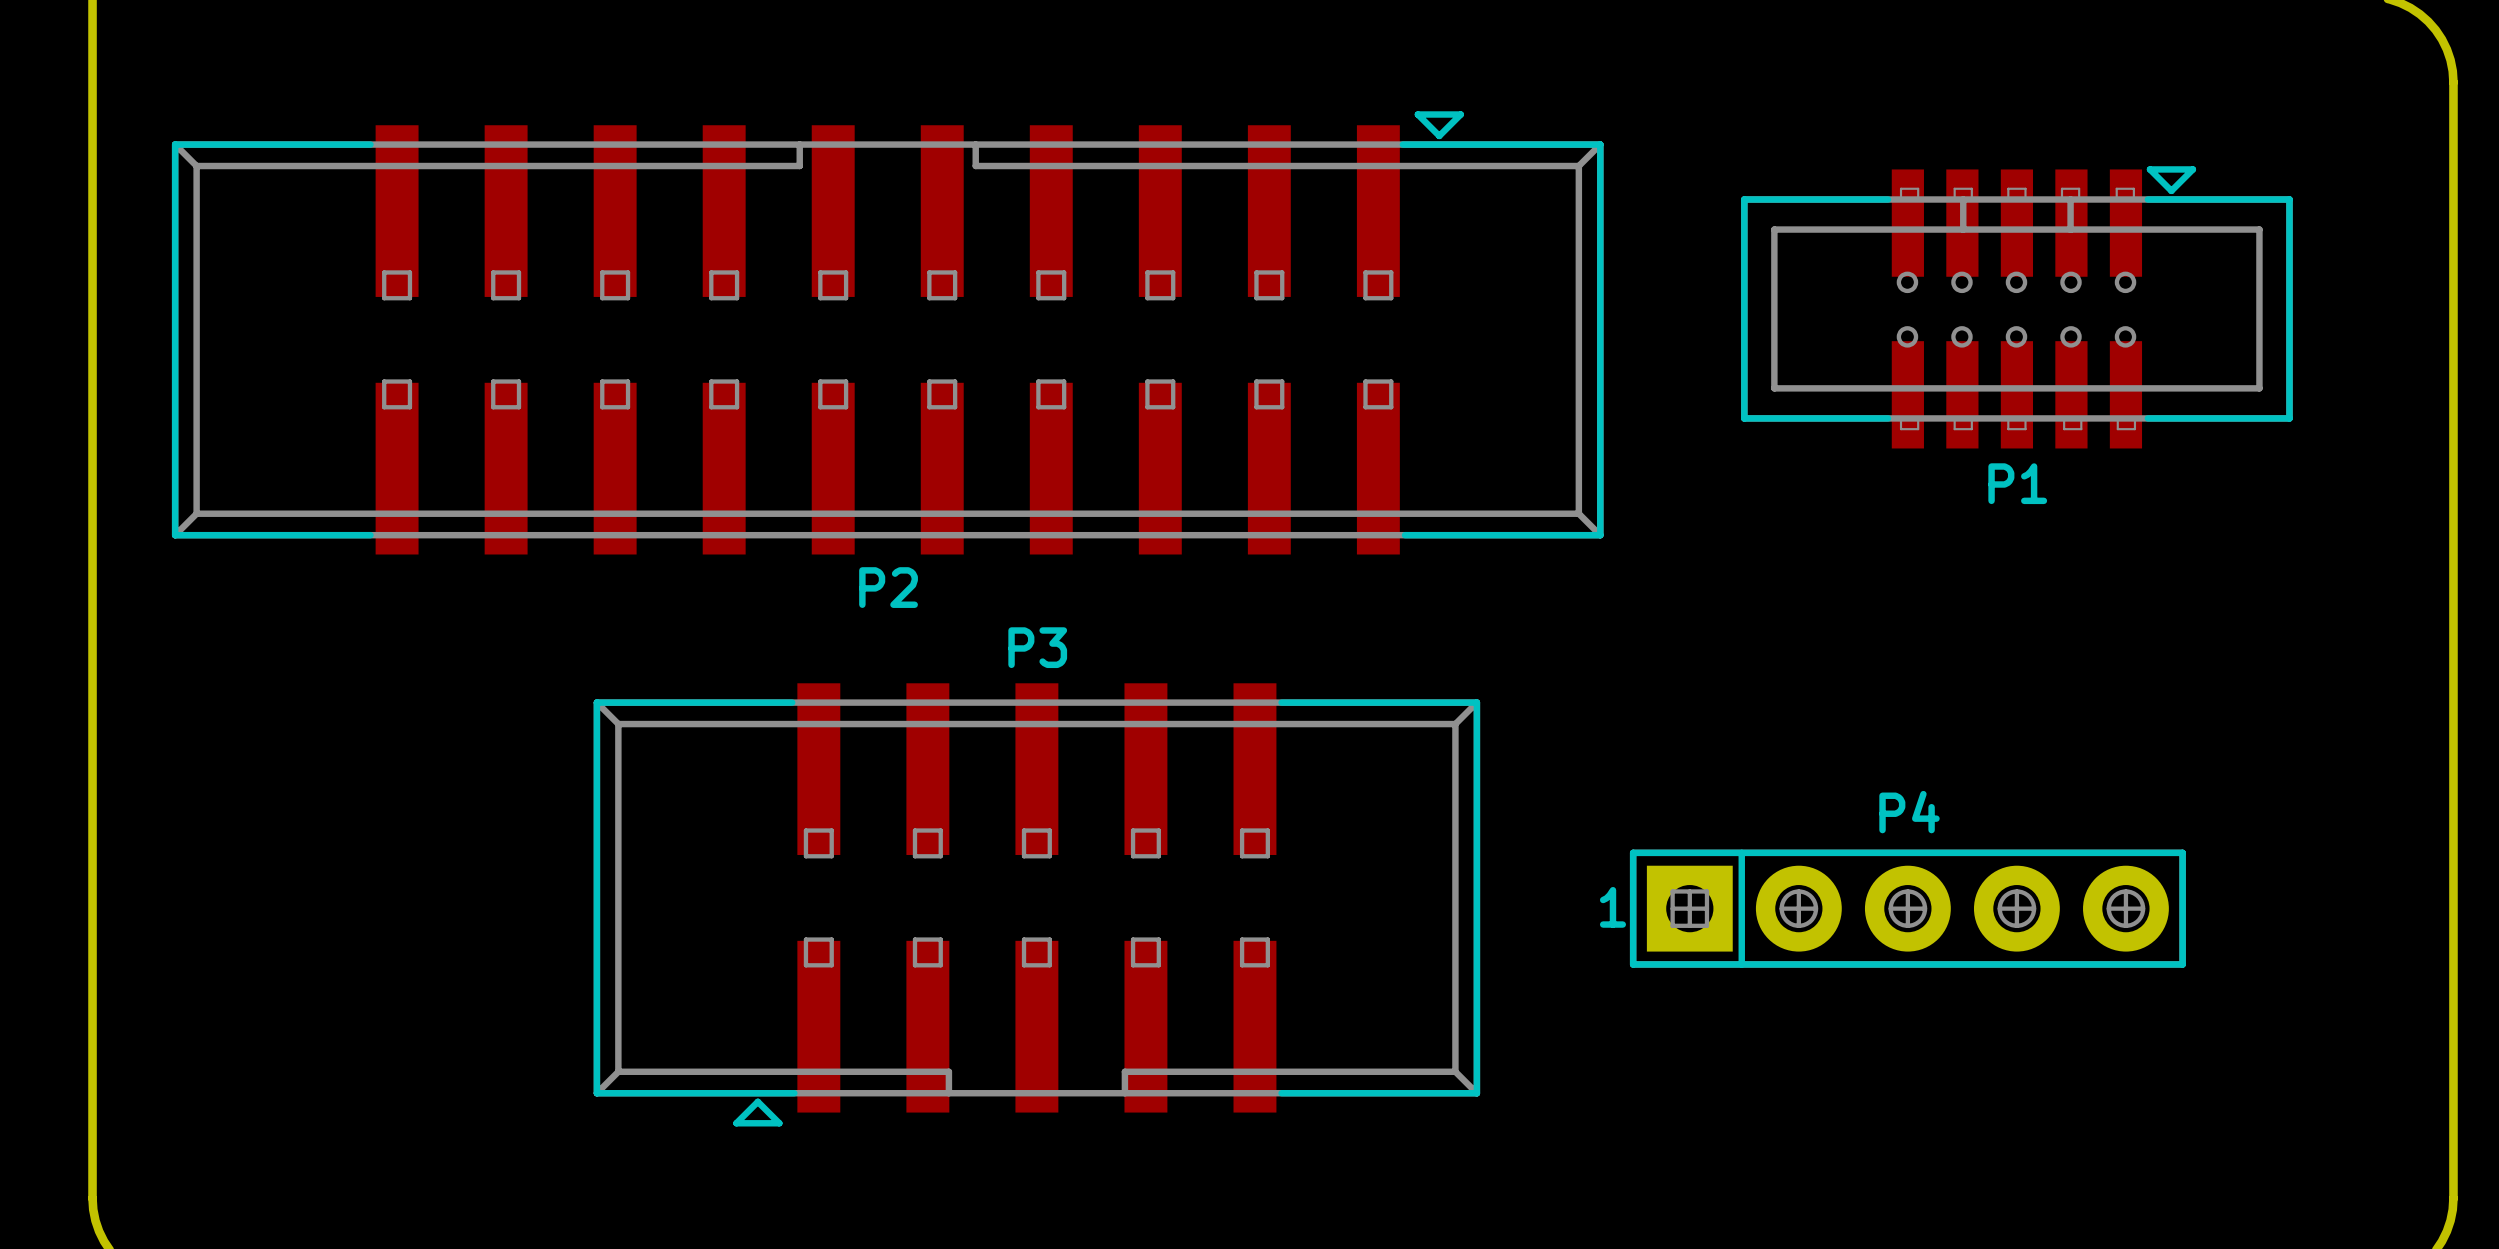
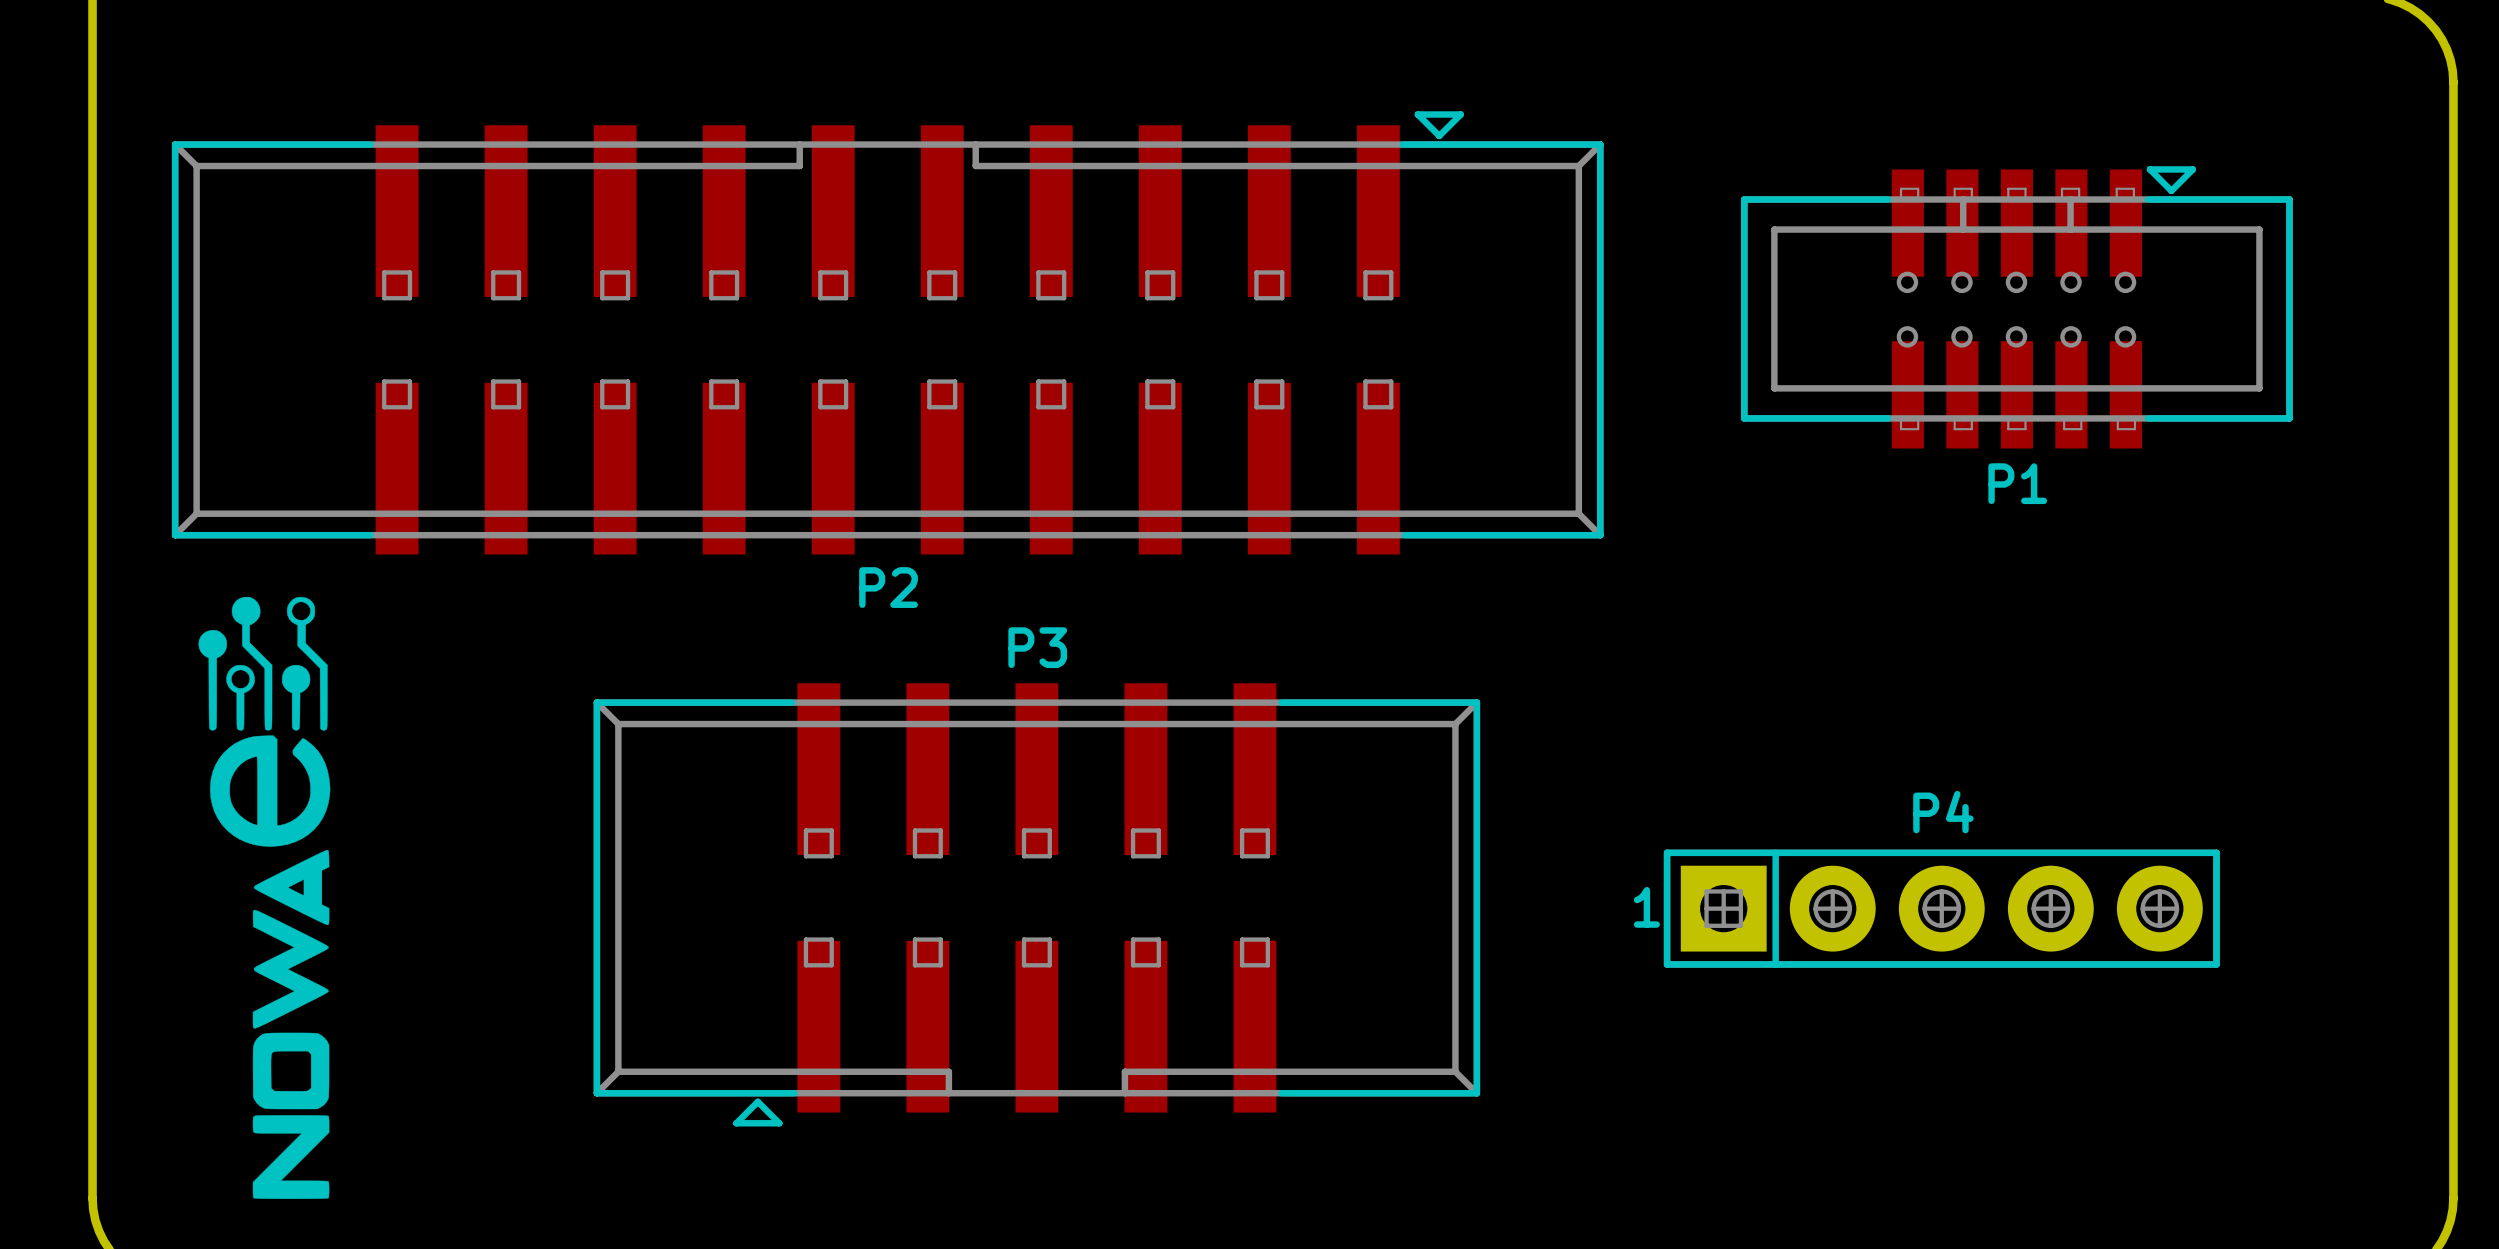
drawing: none -> [198, 596, 331, 1200]
P4 position: (1907, 908) -> (1941, 908)

